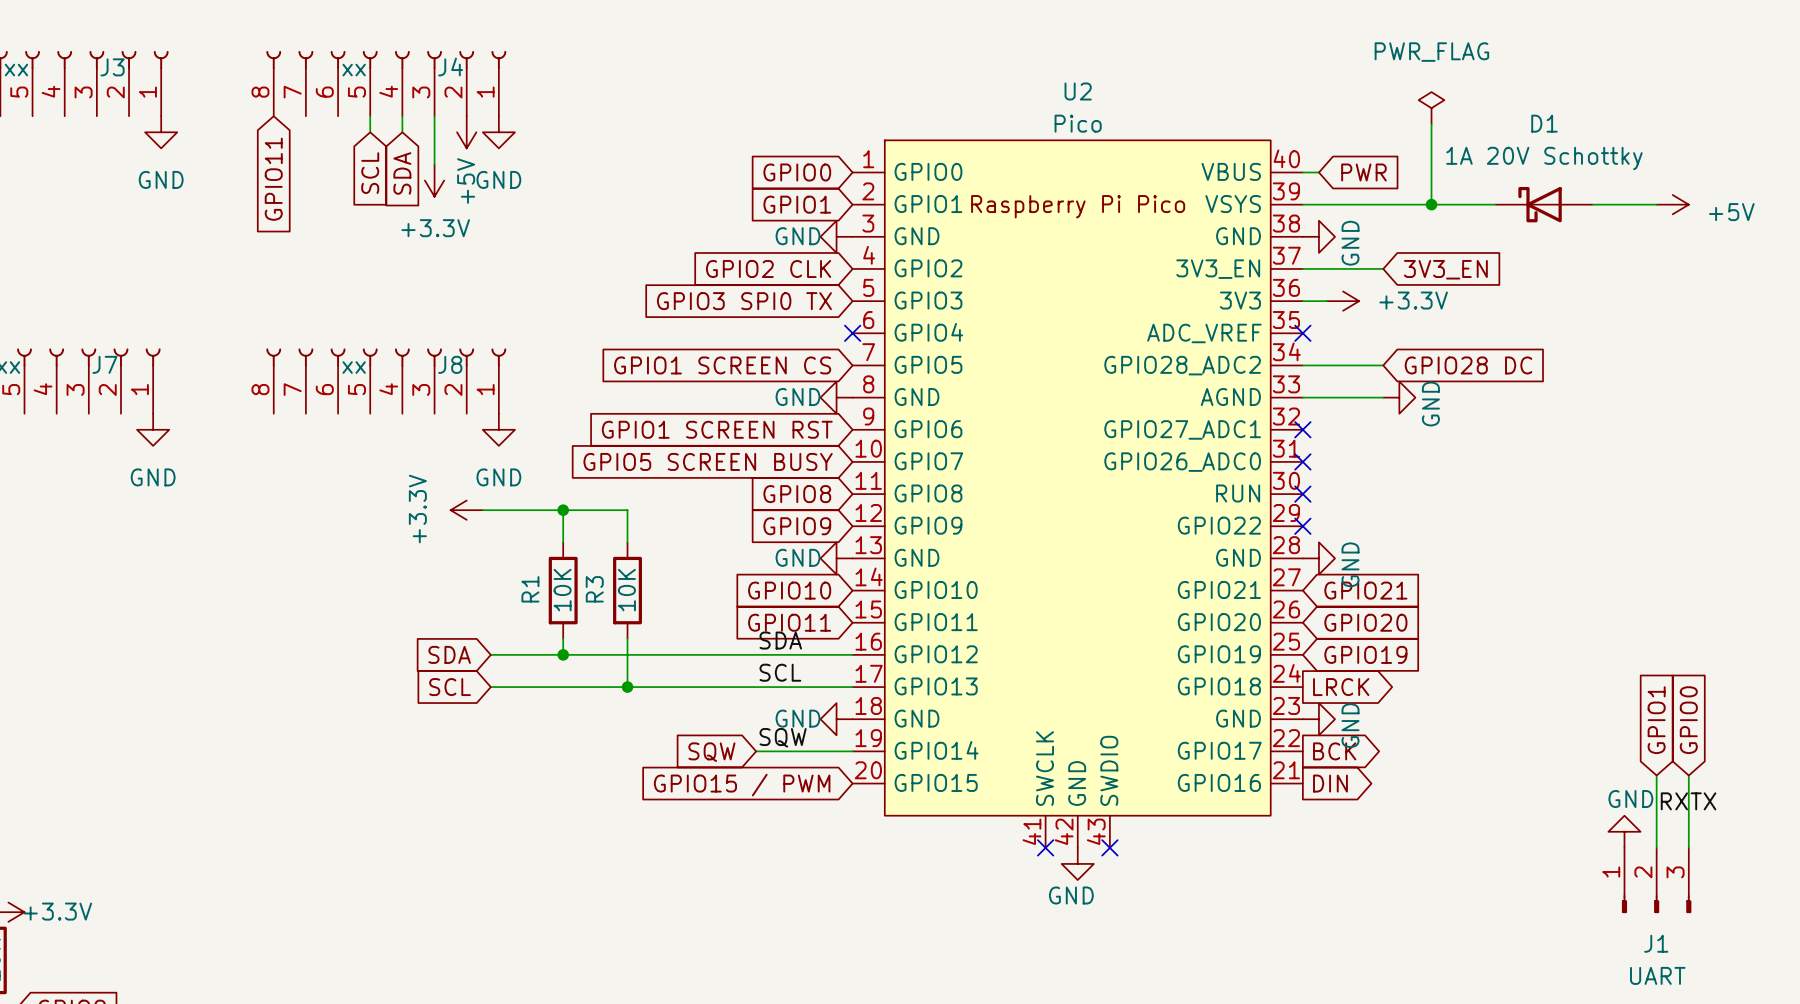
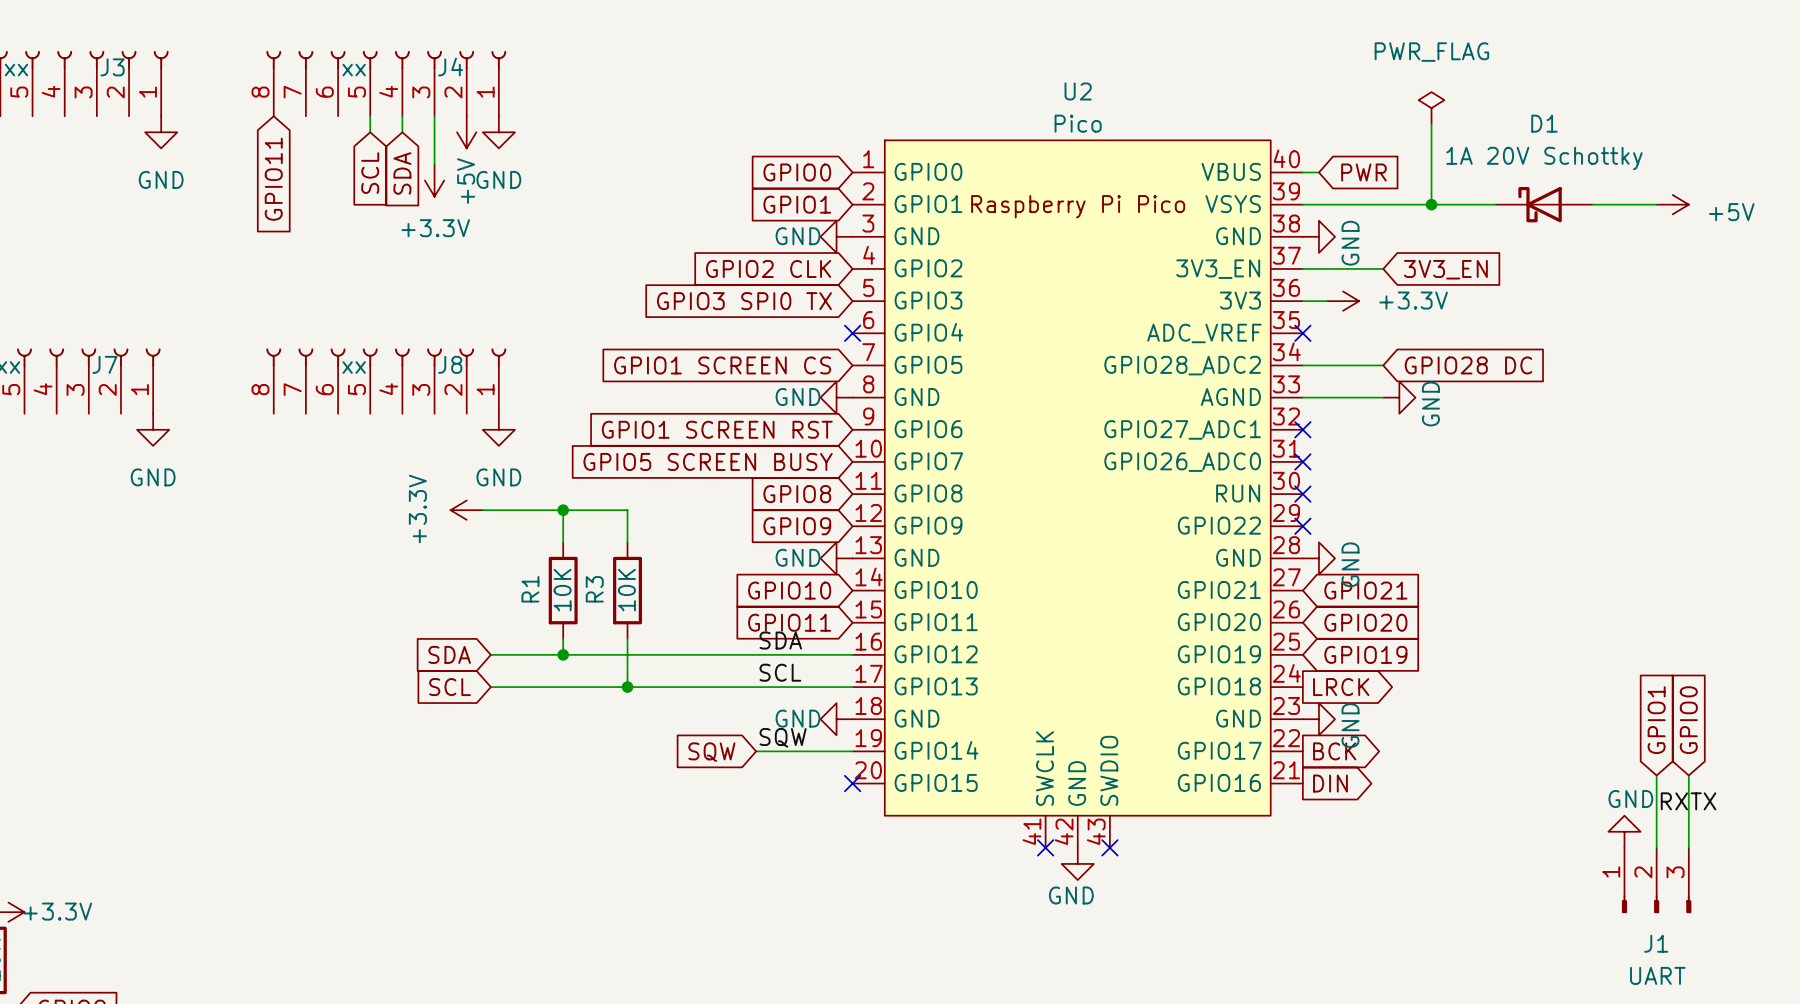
no-connect mark: none -> (852, 783)
global label: GPIO15 / PWM (742, 785) -> none

